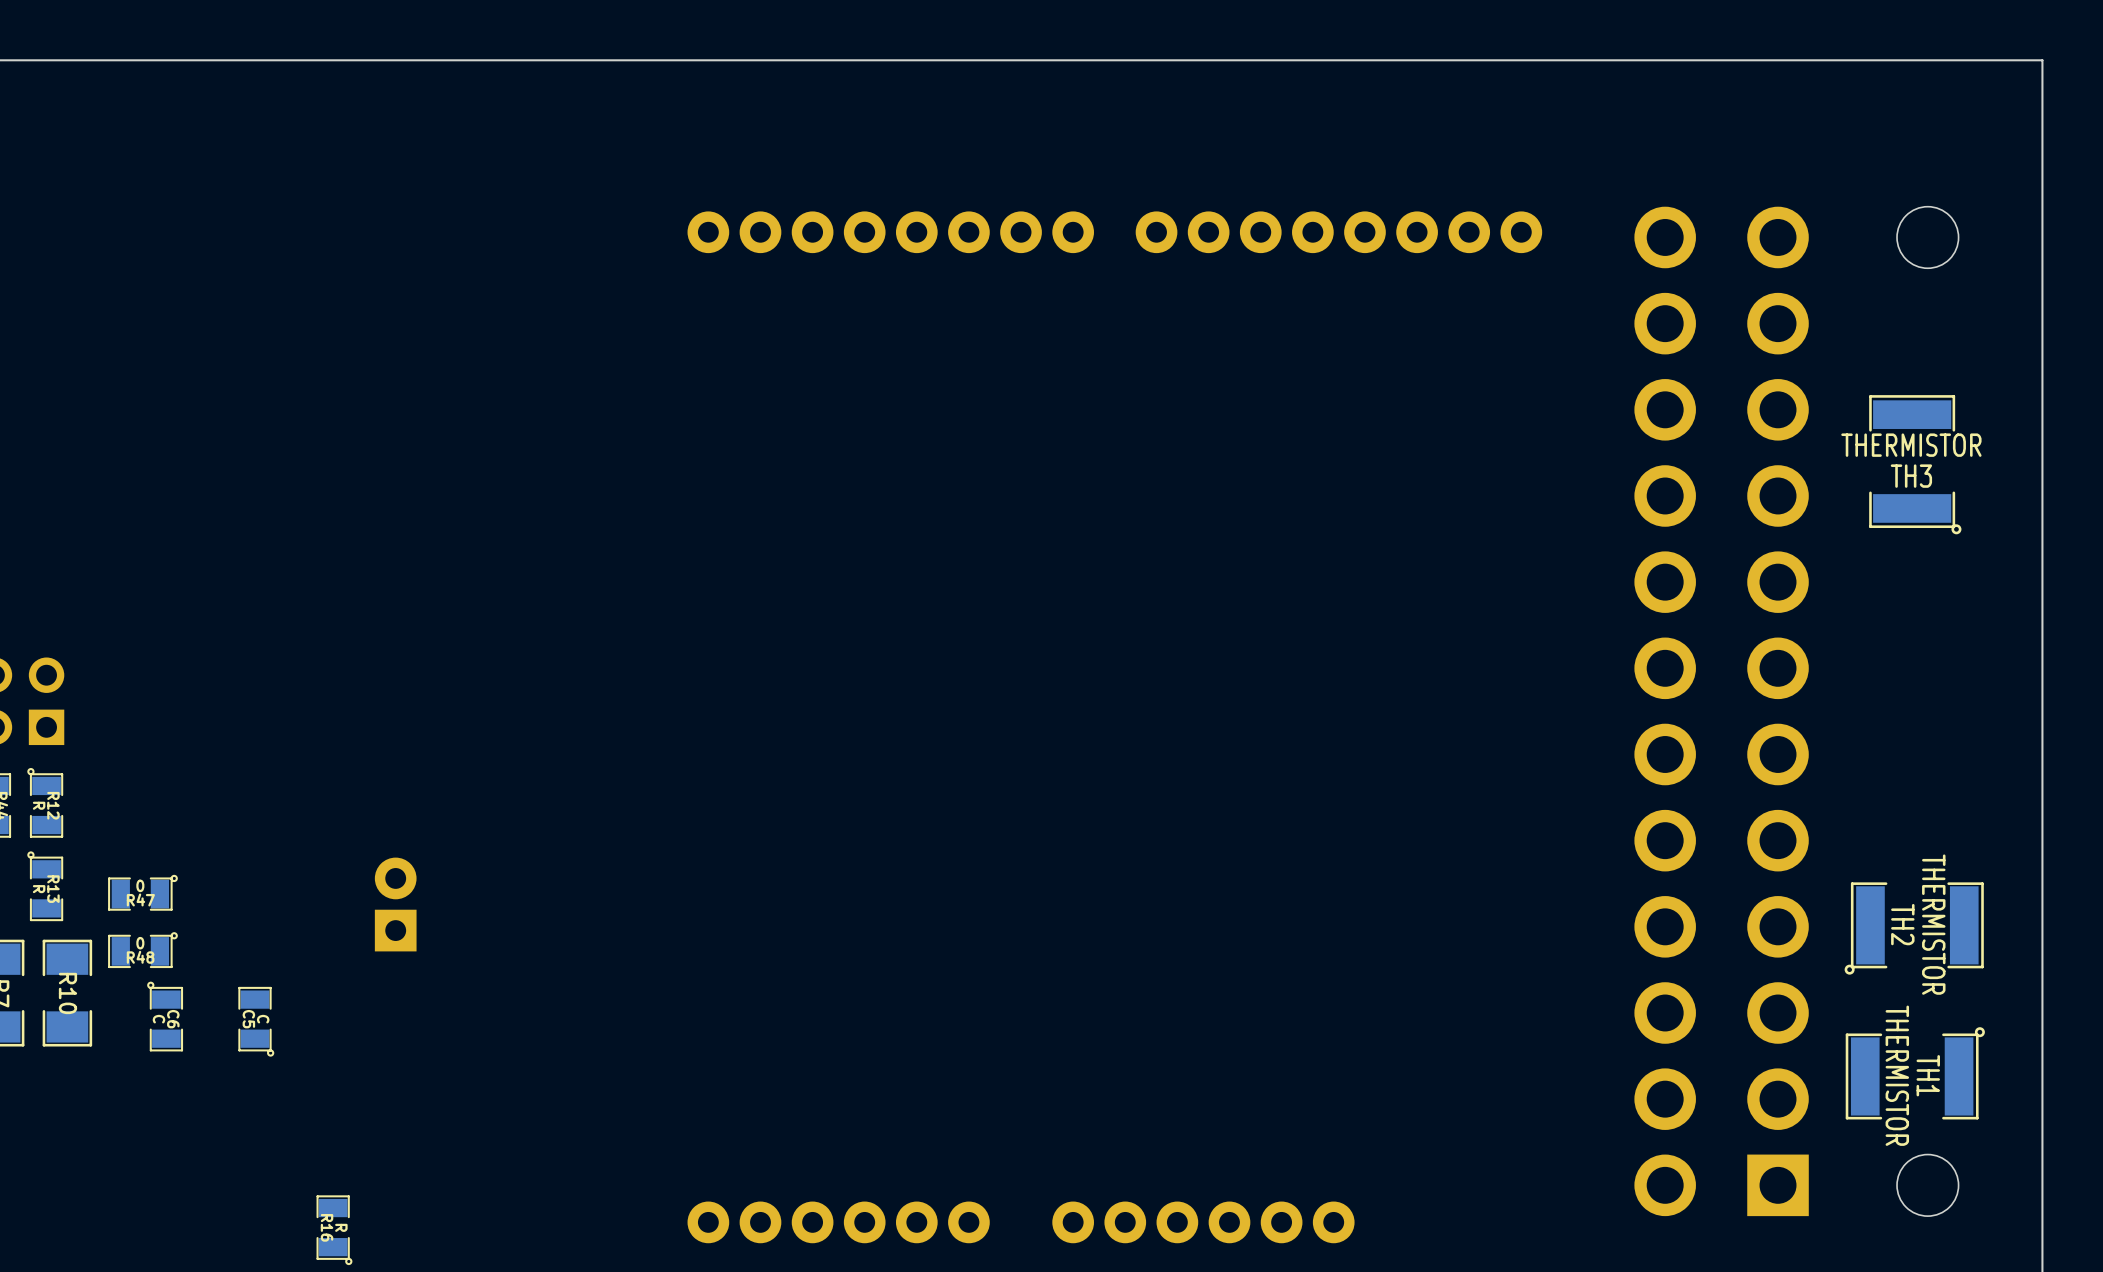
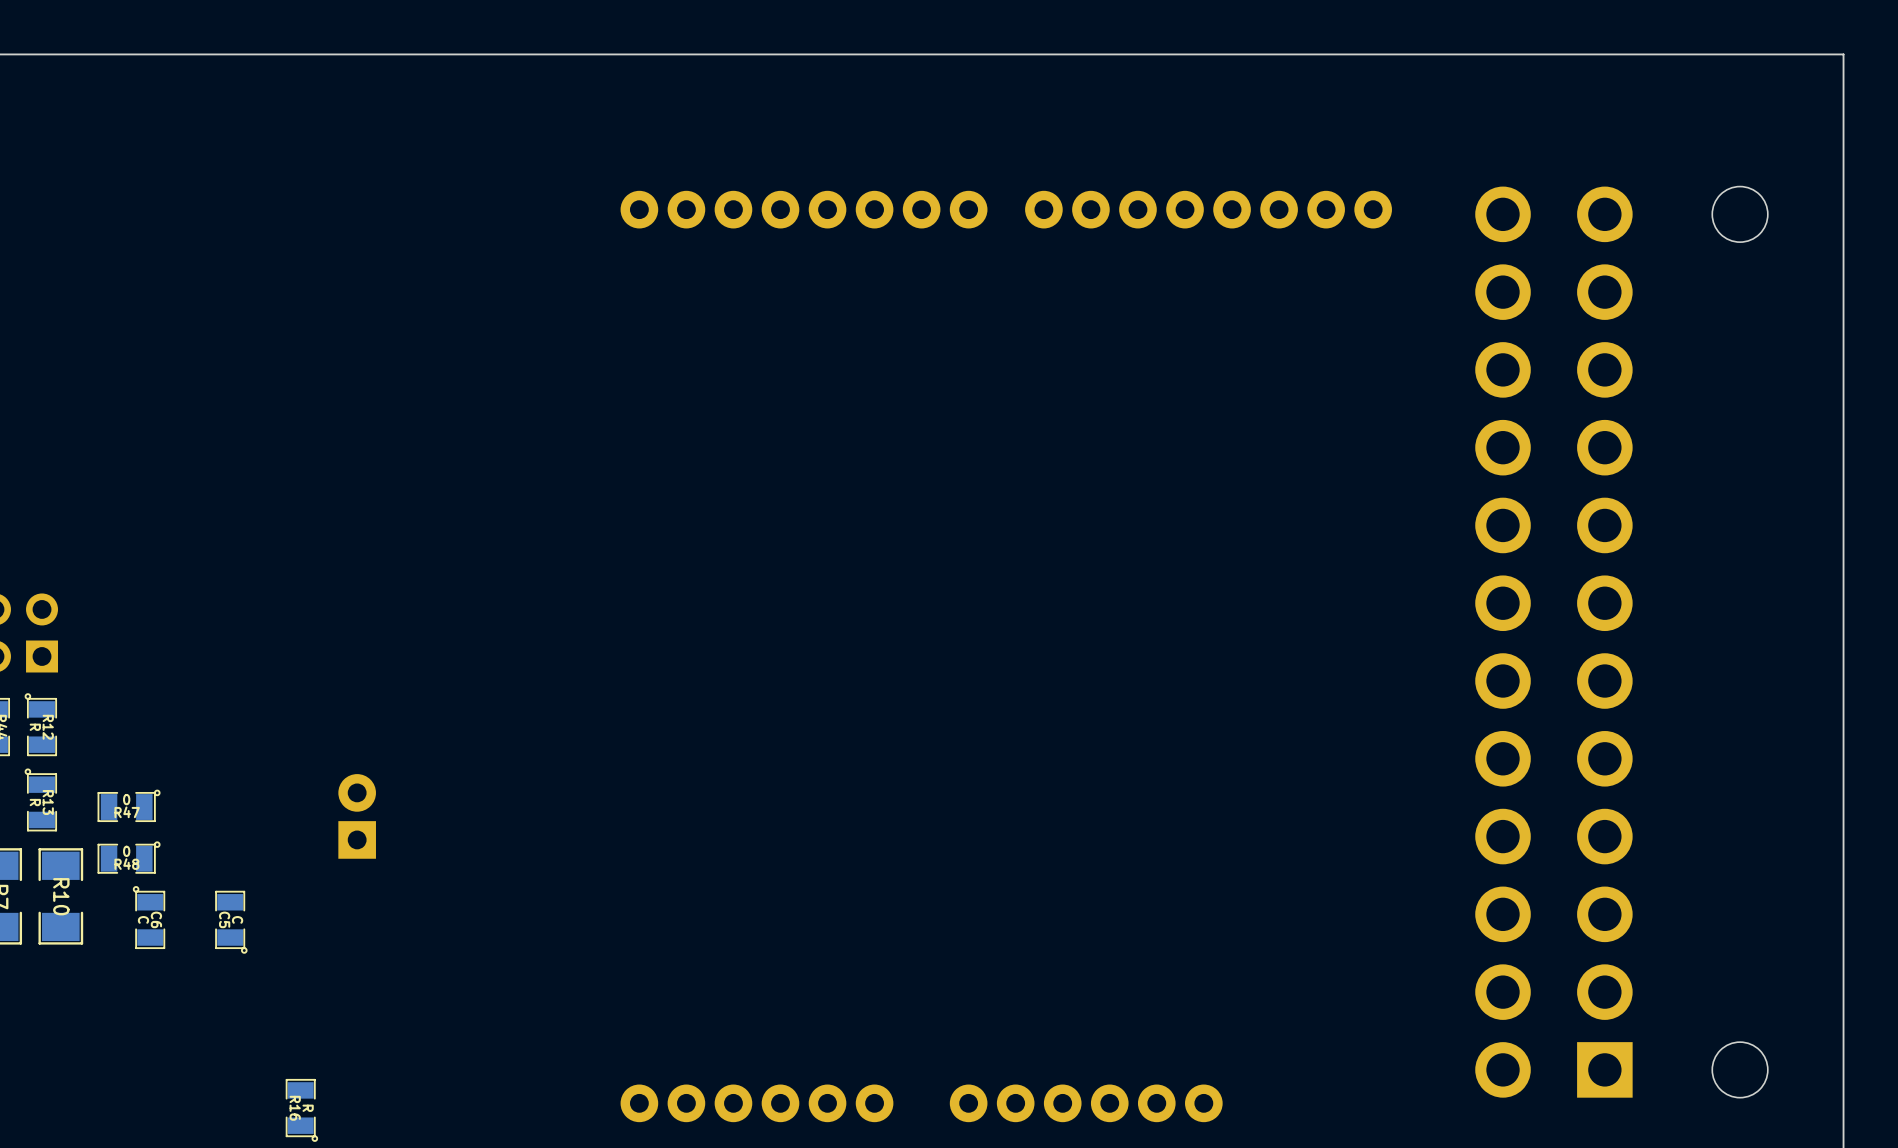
TH3: THERMISTOR (1915, 464) -> none
TH2: THERMISTOR (1914, 928) -> none
TH1: THERMISTOR (1915, 1073) -> none

